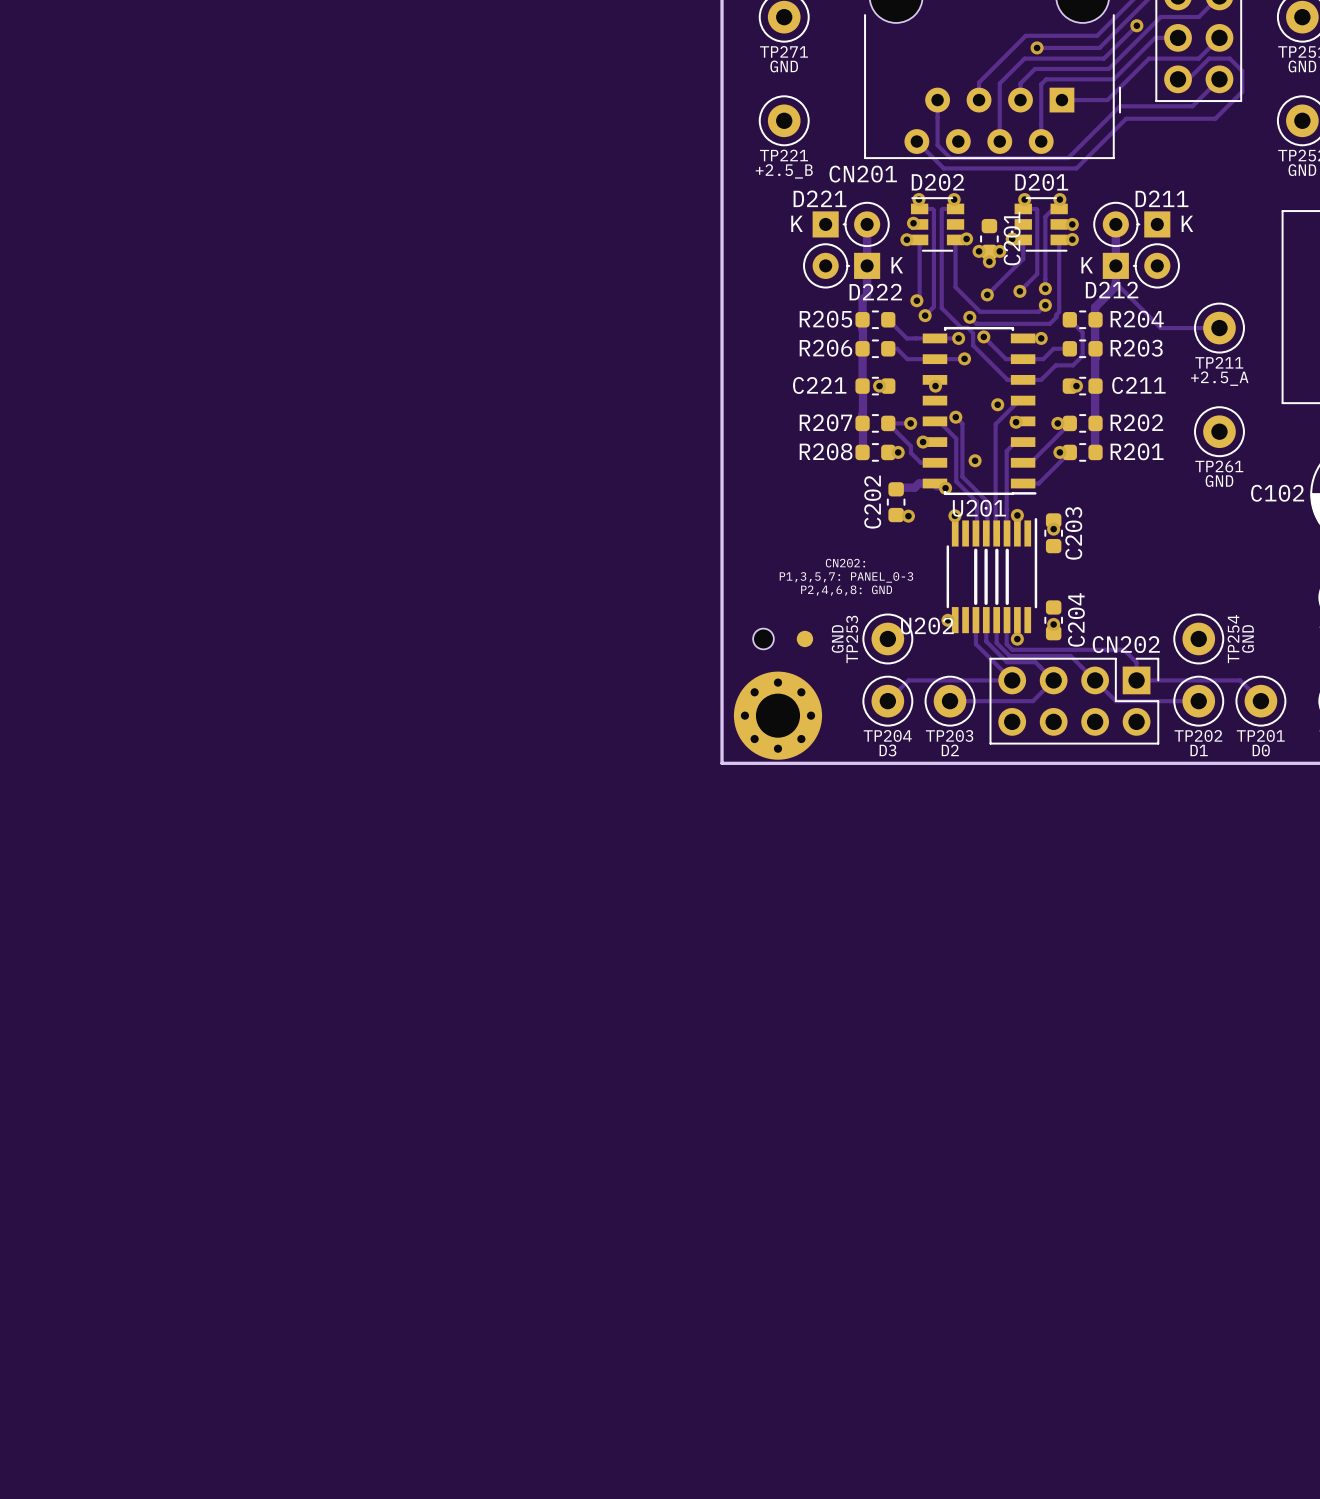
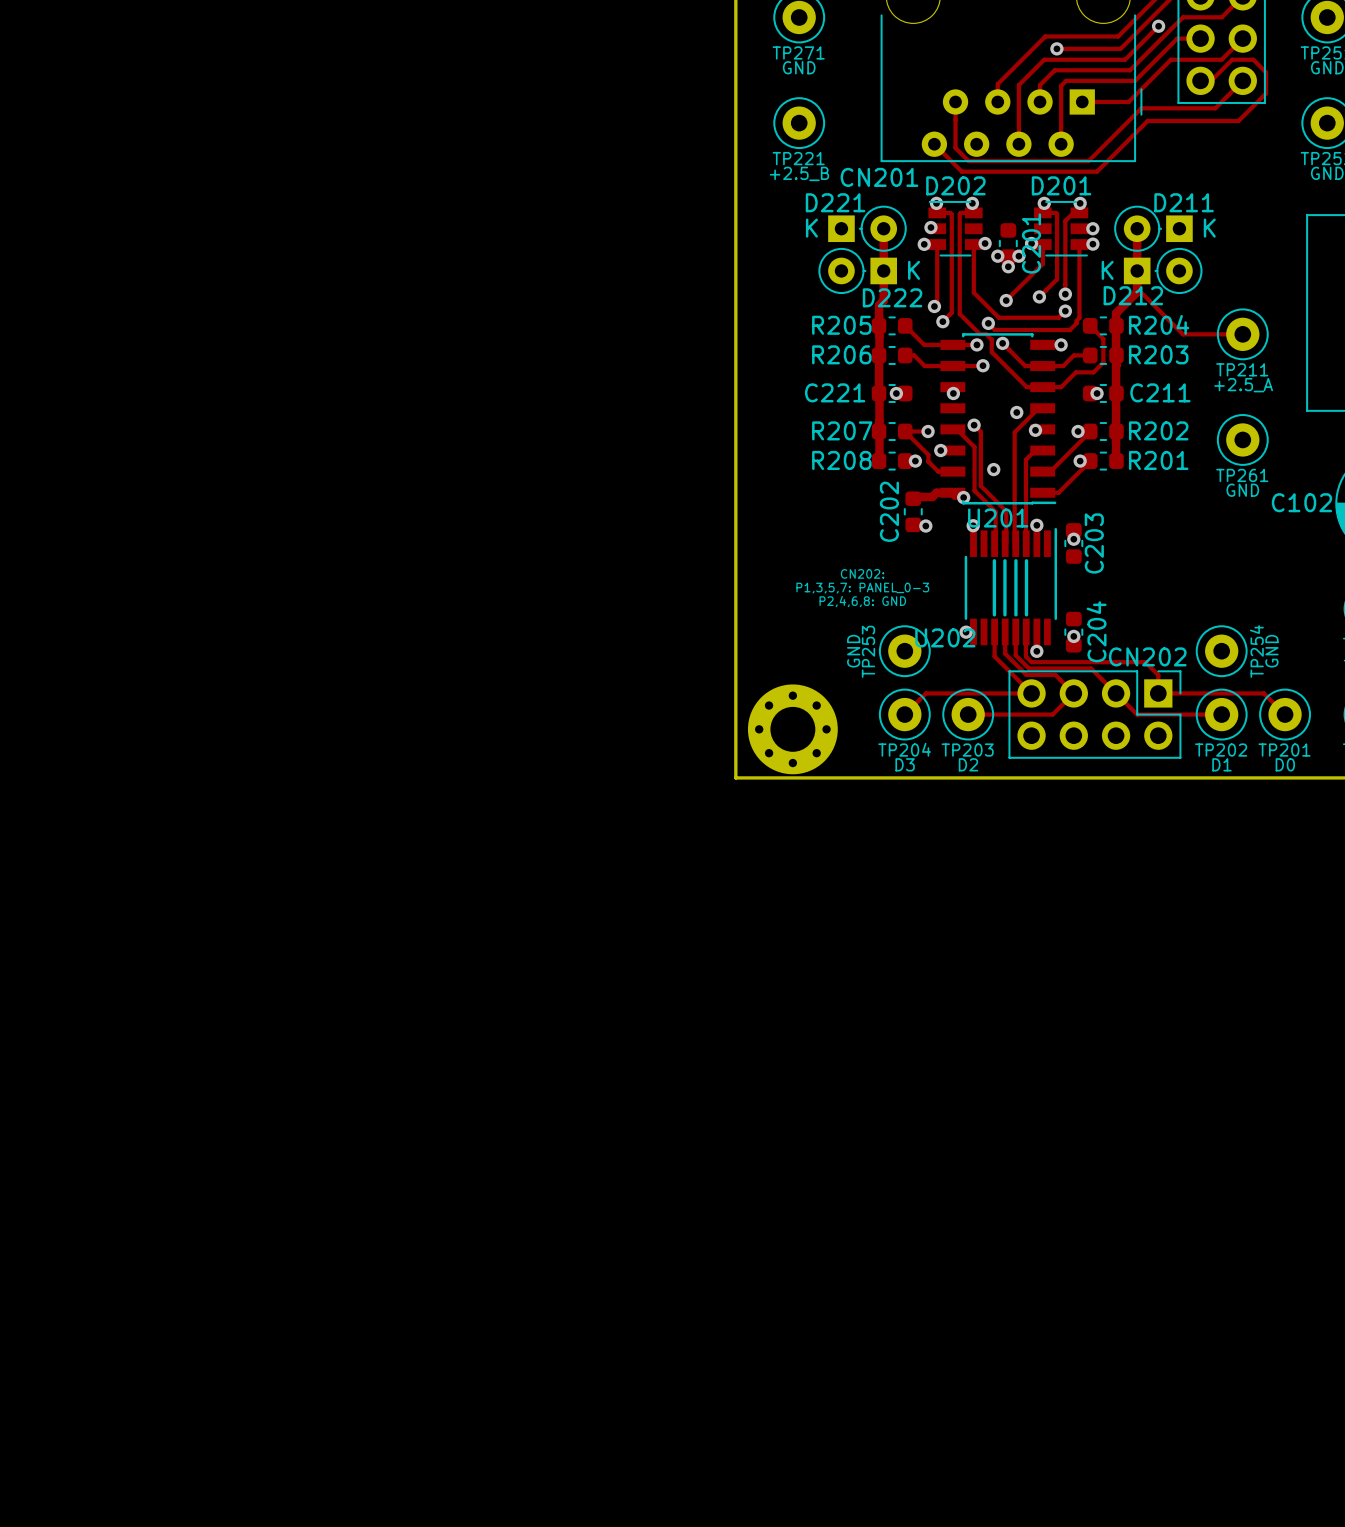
part: (763, 638) -> none
part: (804, 638) -> none

